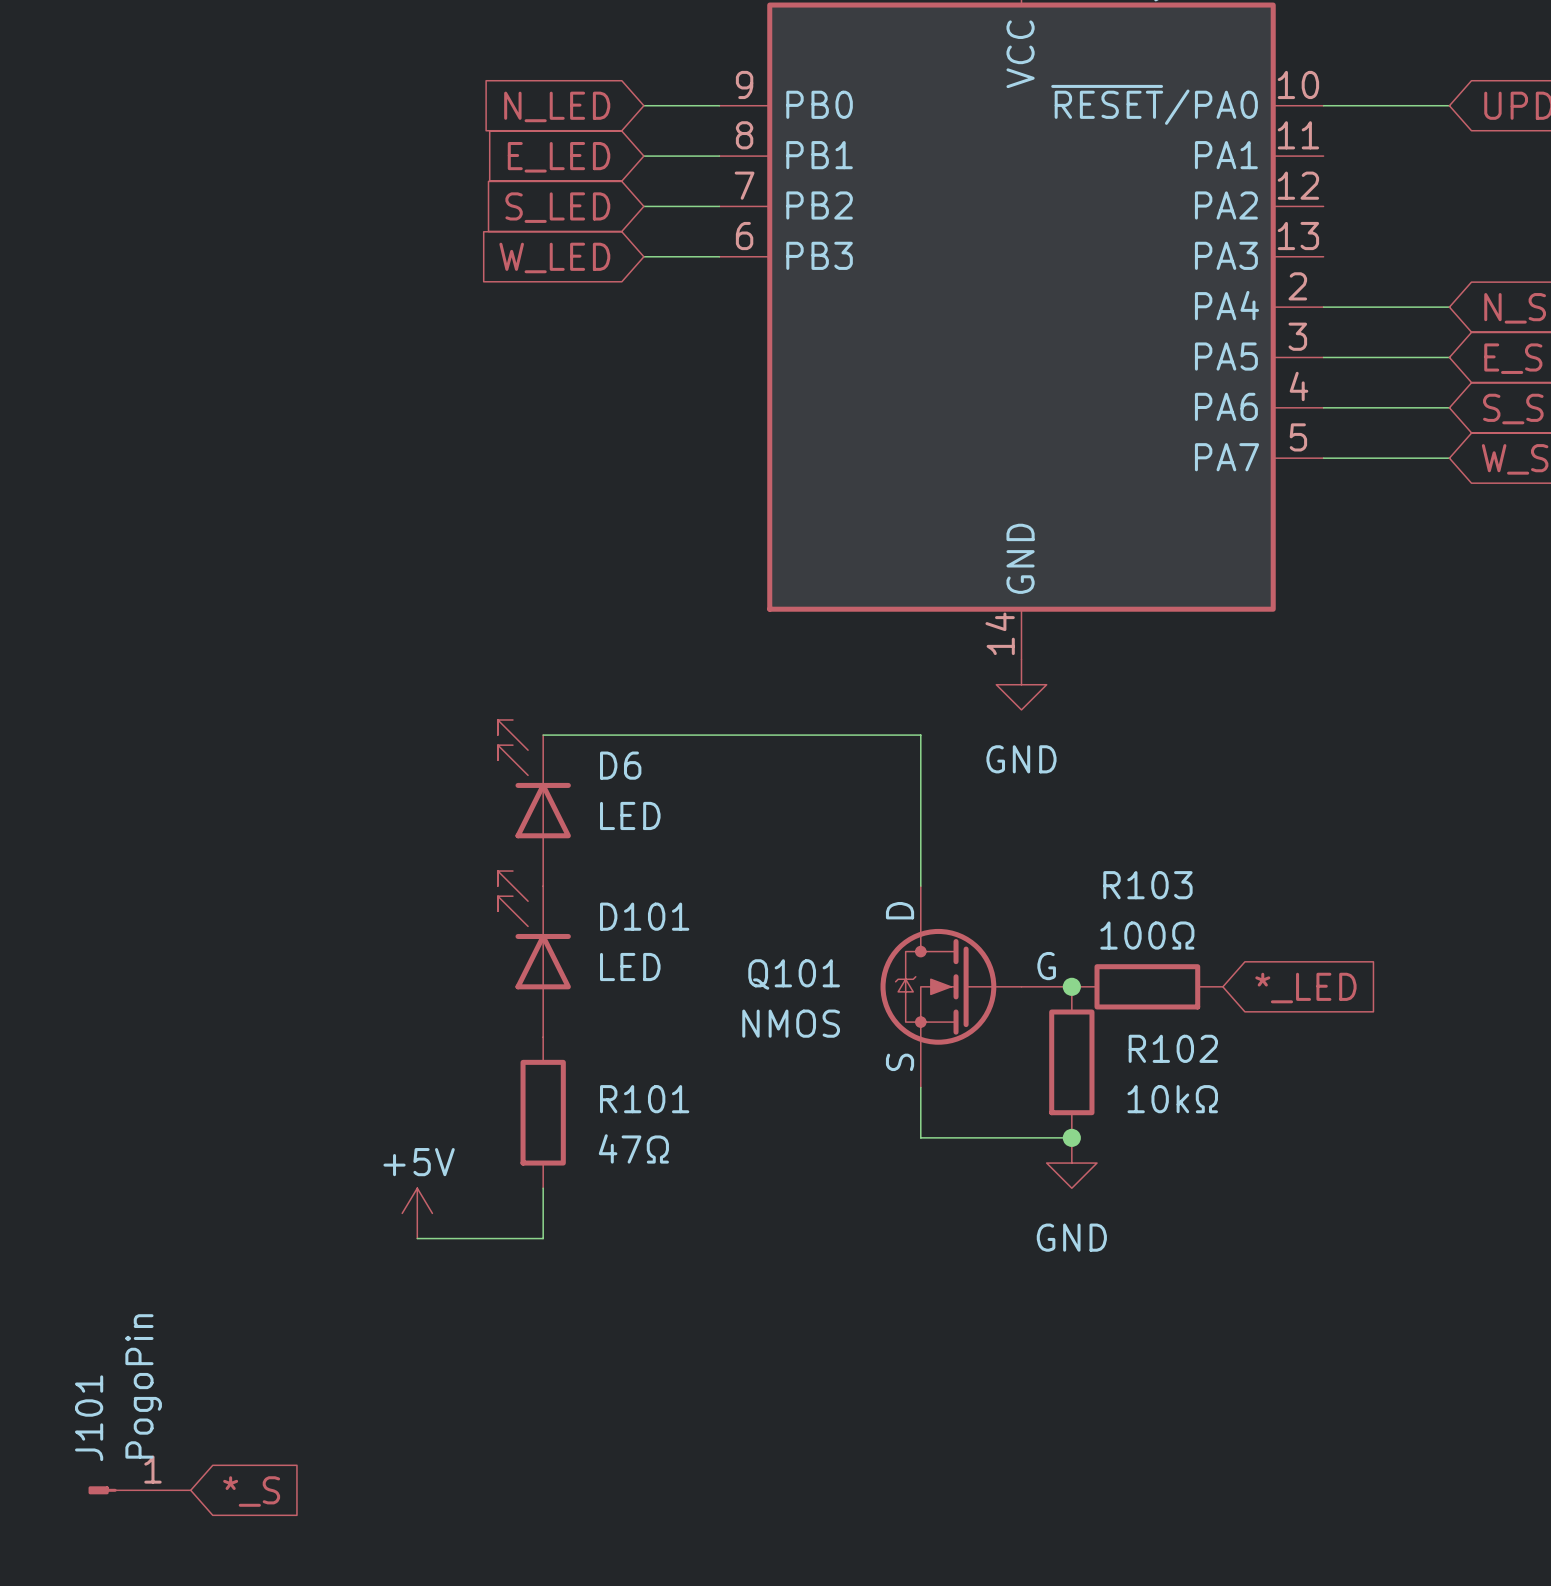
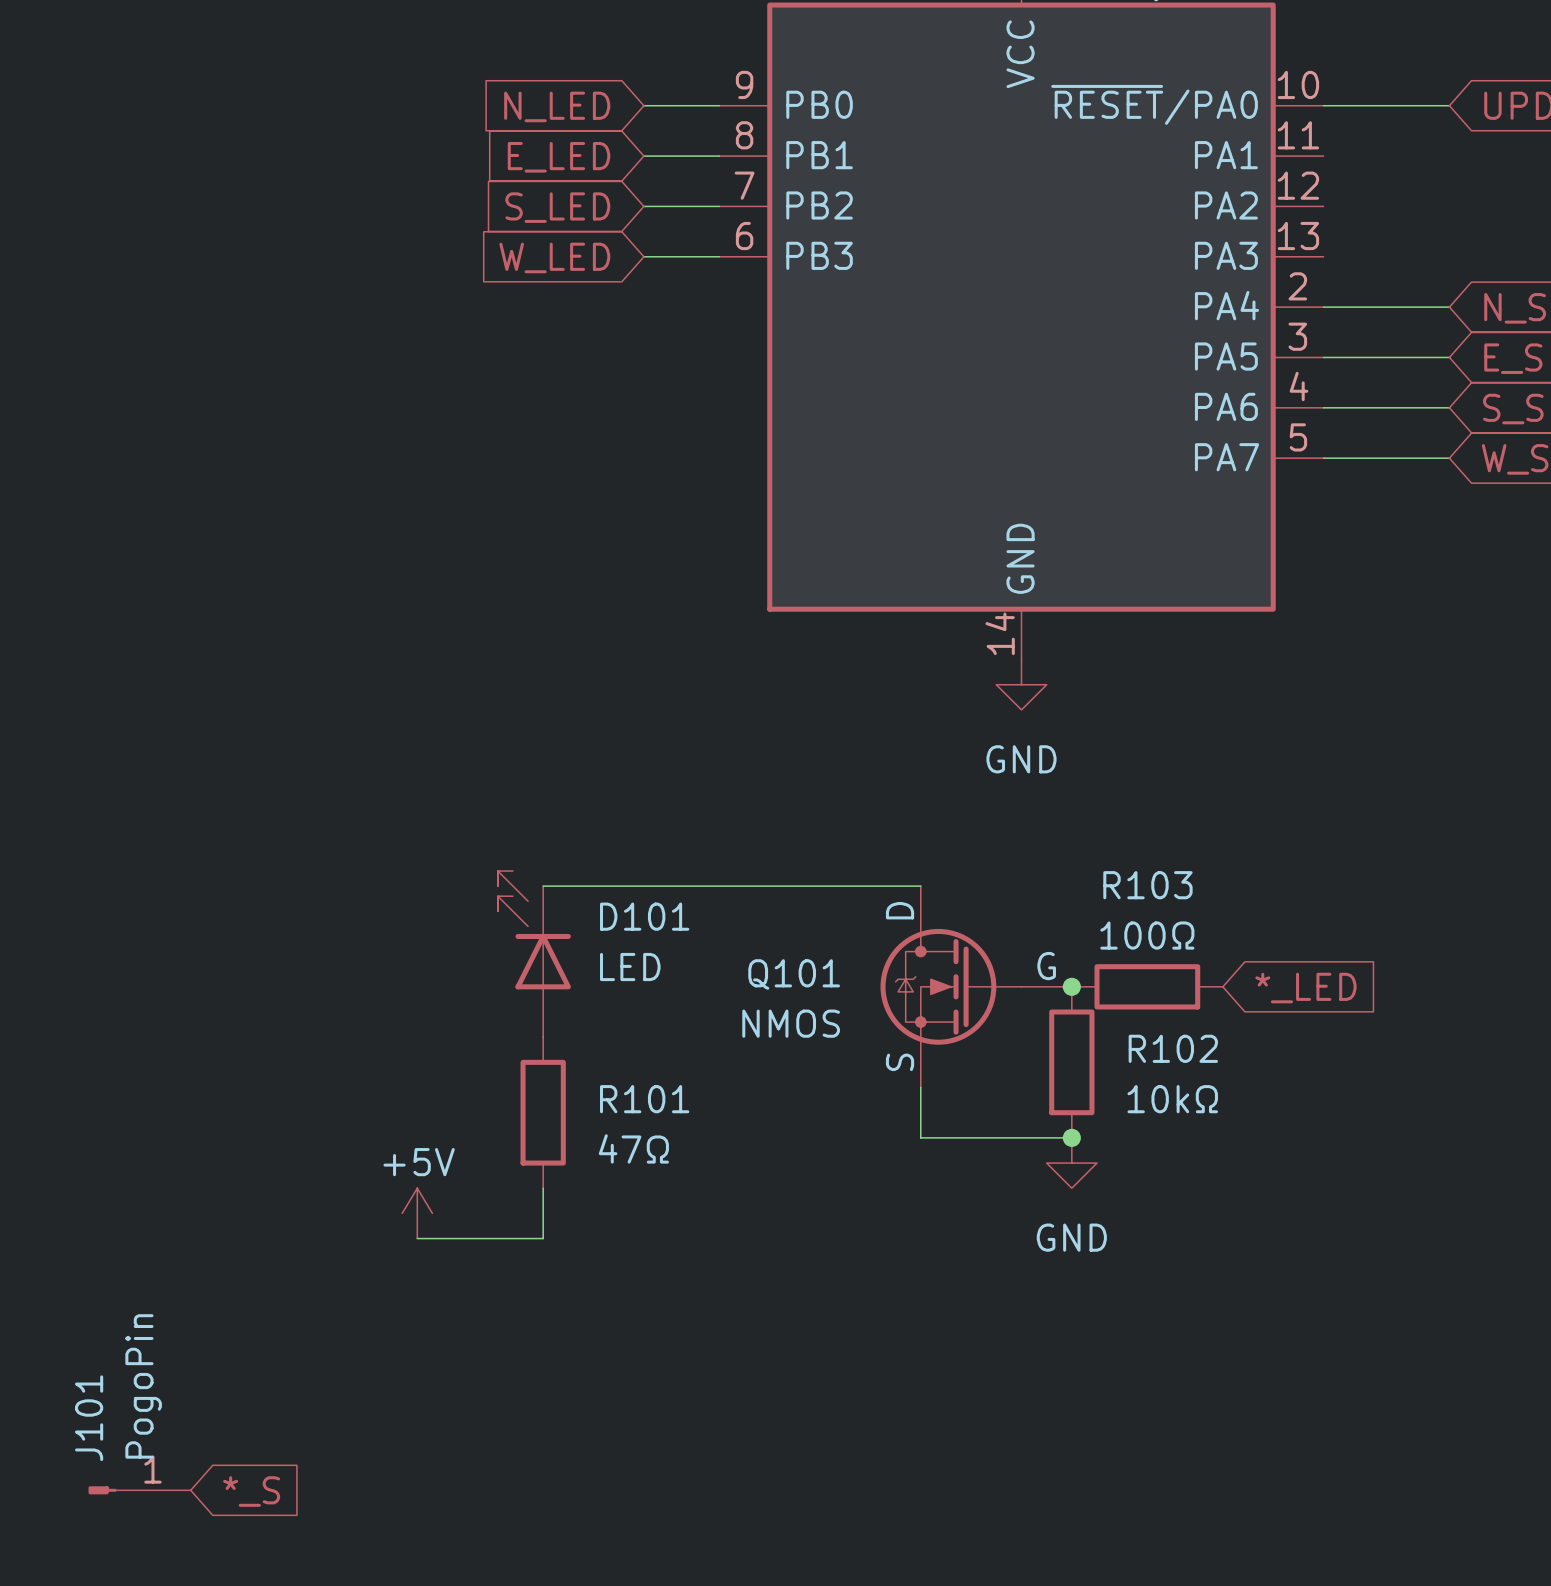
wire: (543, 735) (920, 735) (920, 886) -> (543, 886) (920, 886)
D6: LED (534, 803) -> none

